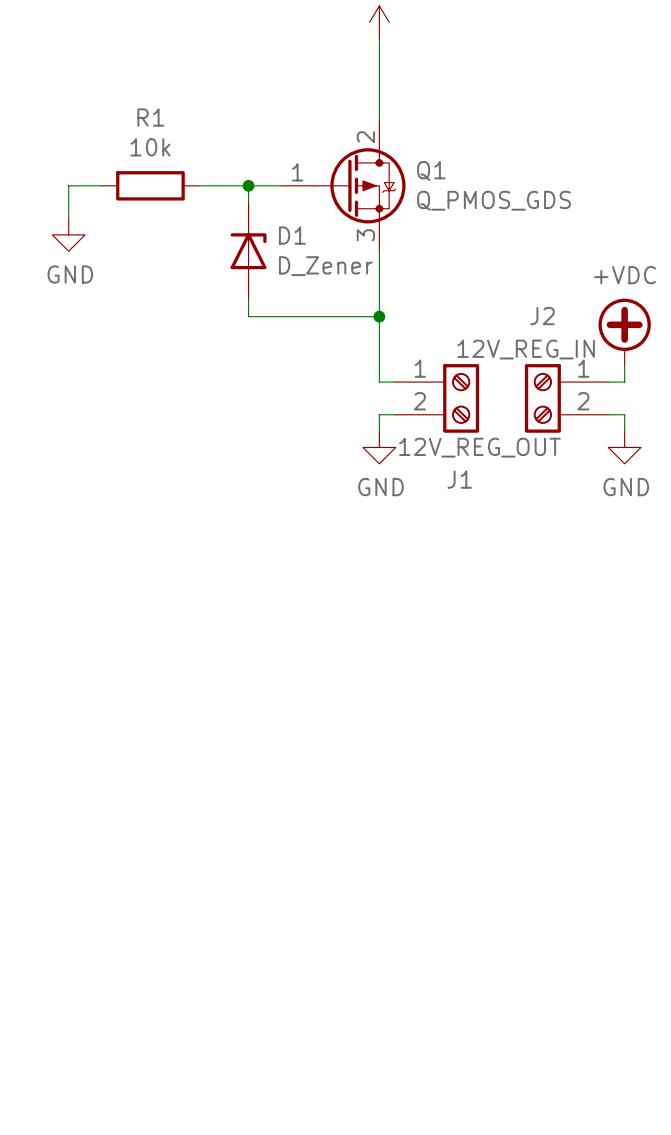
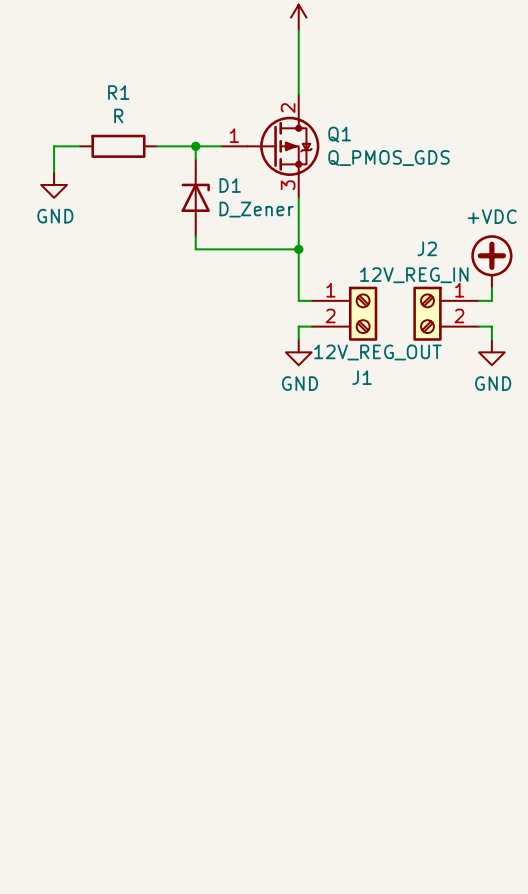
R1 value: 10k (150, 147) -> R (118, 115)

